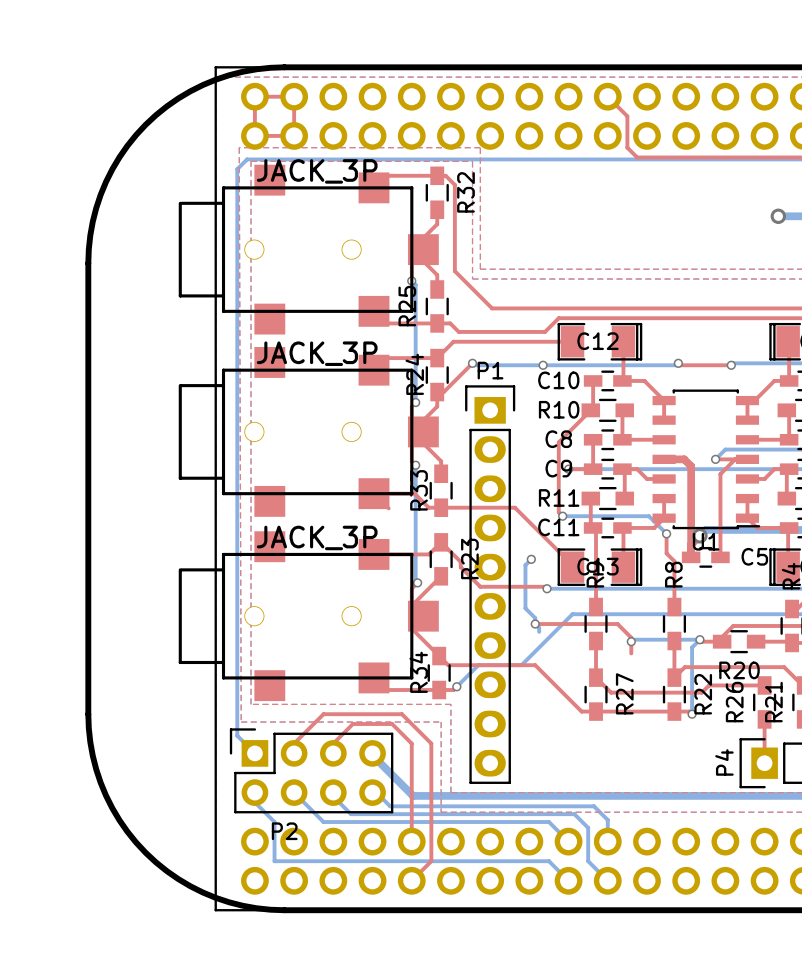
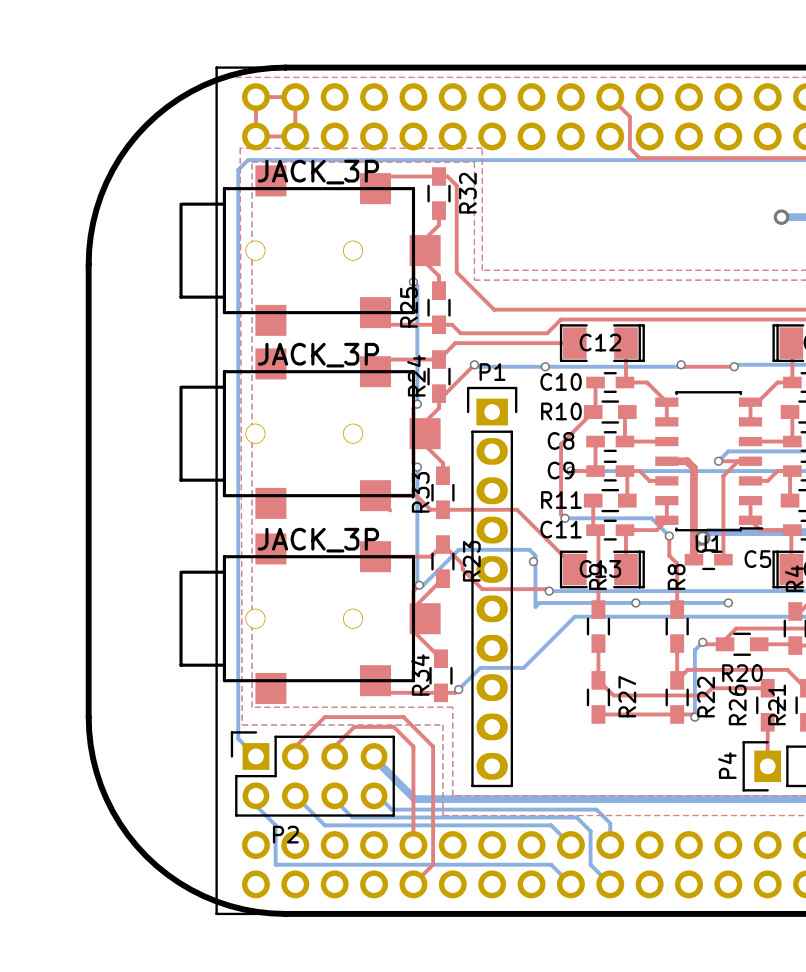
bottom track: (531, 559) (525, 565) (525, 608) (535, 618) (535, 624) (539, 627) (539, 631) -> none
bottom track: none -> (419, 585) (423, 585) (458, 549) (529, 549) (535, 555) (535, 606) (539, 602) (728, 602)
via: none -> (728, 602)
top track: (535, 624) (617, 624) (631, 637) (631, 653) -> none
via: (535, 624) -> none
bottom track: (699, 639) (633, 639) (631, 641) -> none
via position: (631, 641) -> (635, 602)
top track: (439, 656) (448, 665) (535, 665) (581, 711) (596, 711) -> none

